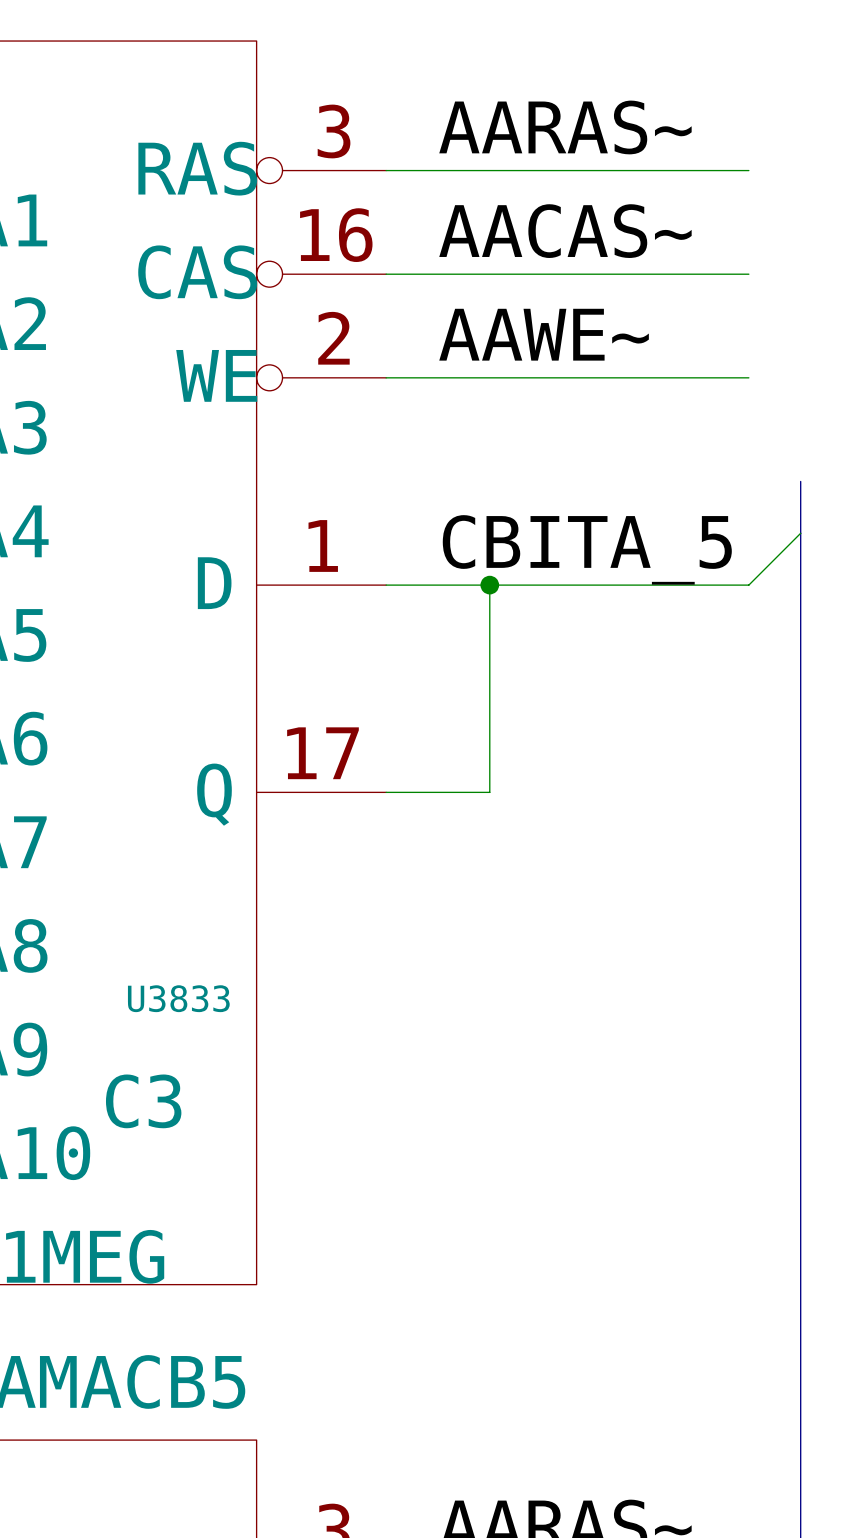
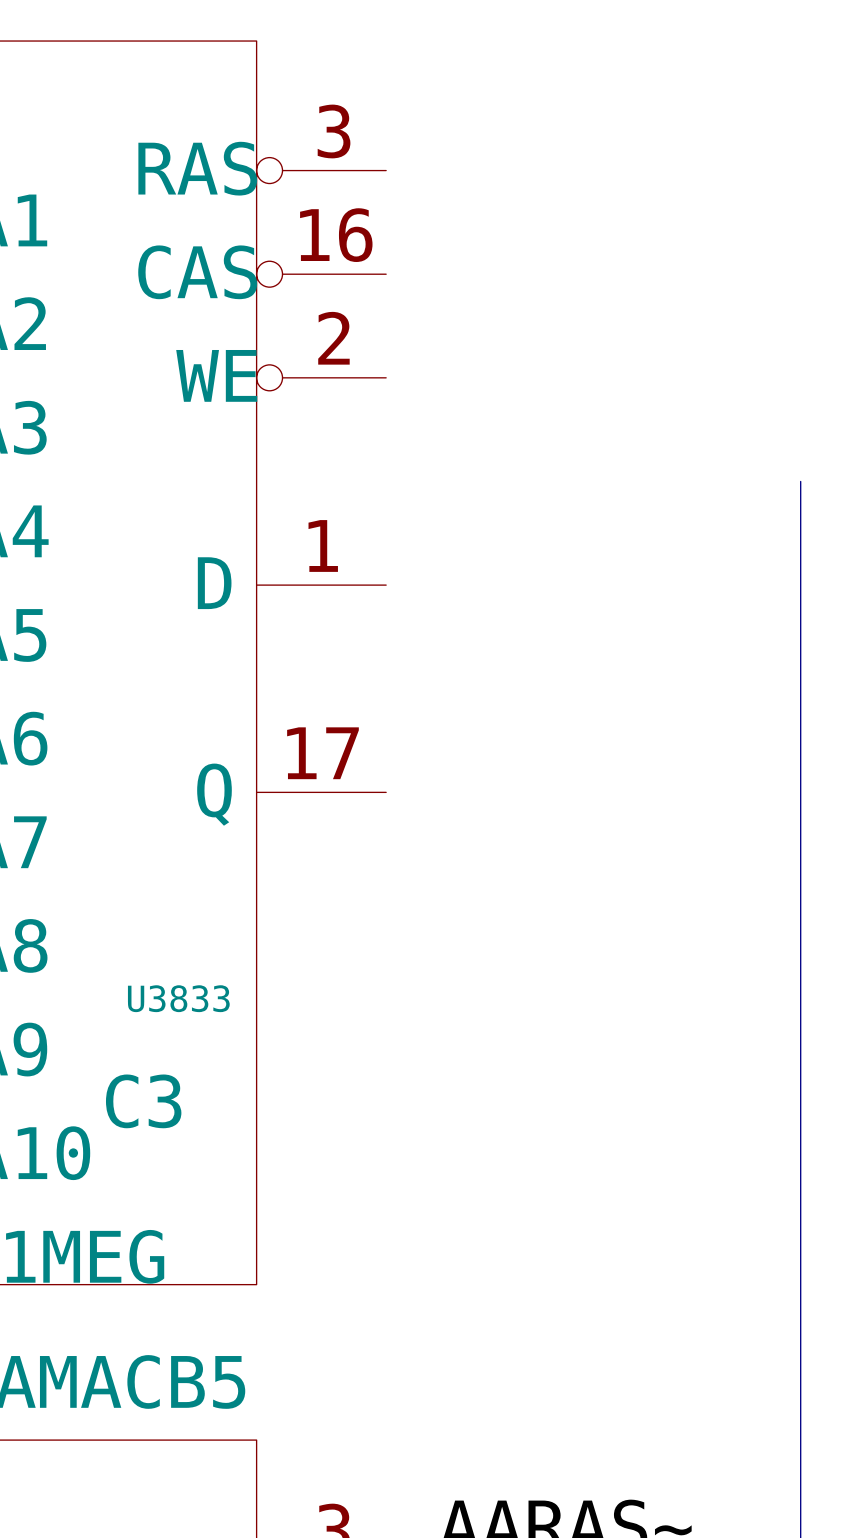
label: AARAS~ (565, 127) -> none
wire: (386, 170) (748, 170) -> none
label: AACAS~ (565, 231) -> none
wire: (386, 274) (748, 274) -> none
label: AAWE~ (544, 334) -> none
wire: (386, 377) (748, 377) -> none
wire: (800, 533) (748, 585) (386, 585) -> none
label: CBITA_5 (587, 549) -> none
wire: (489, 585) (489, 792) (386, 792) -> none
junction: (489, 585) -> none

